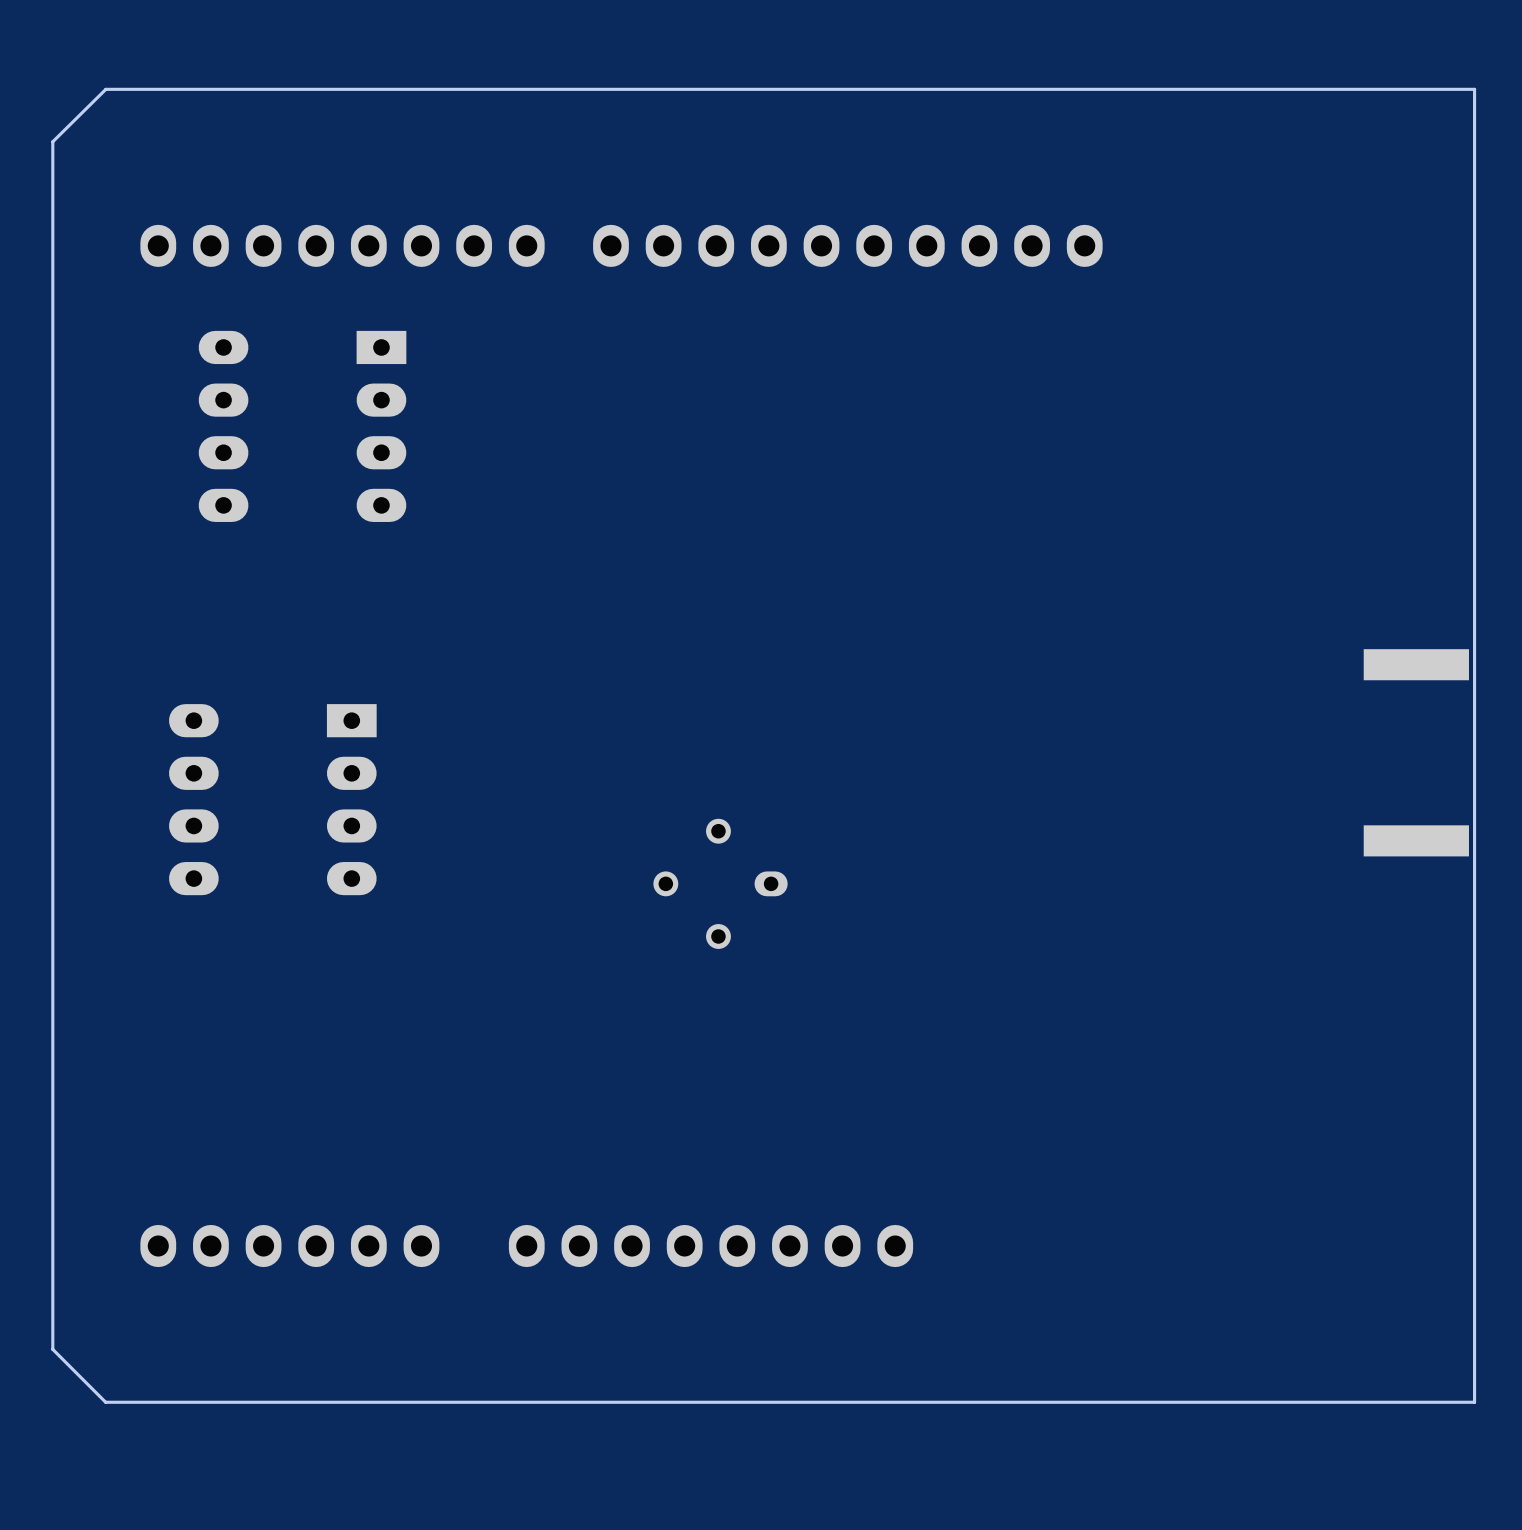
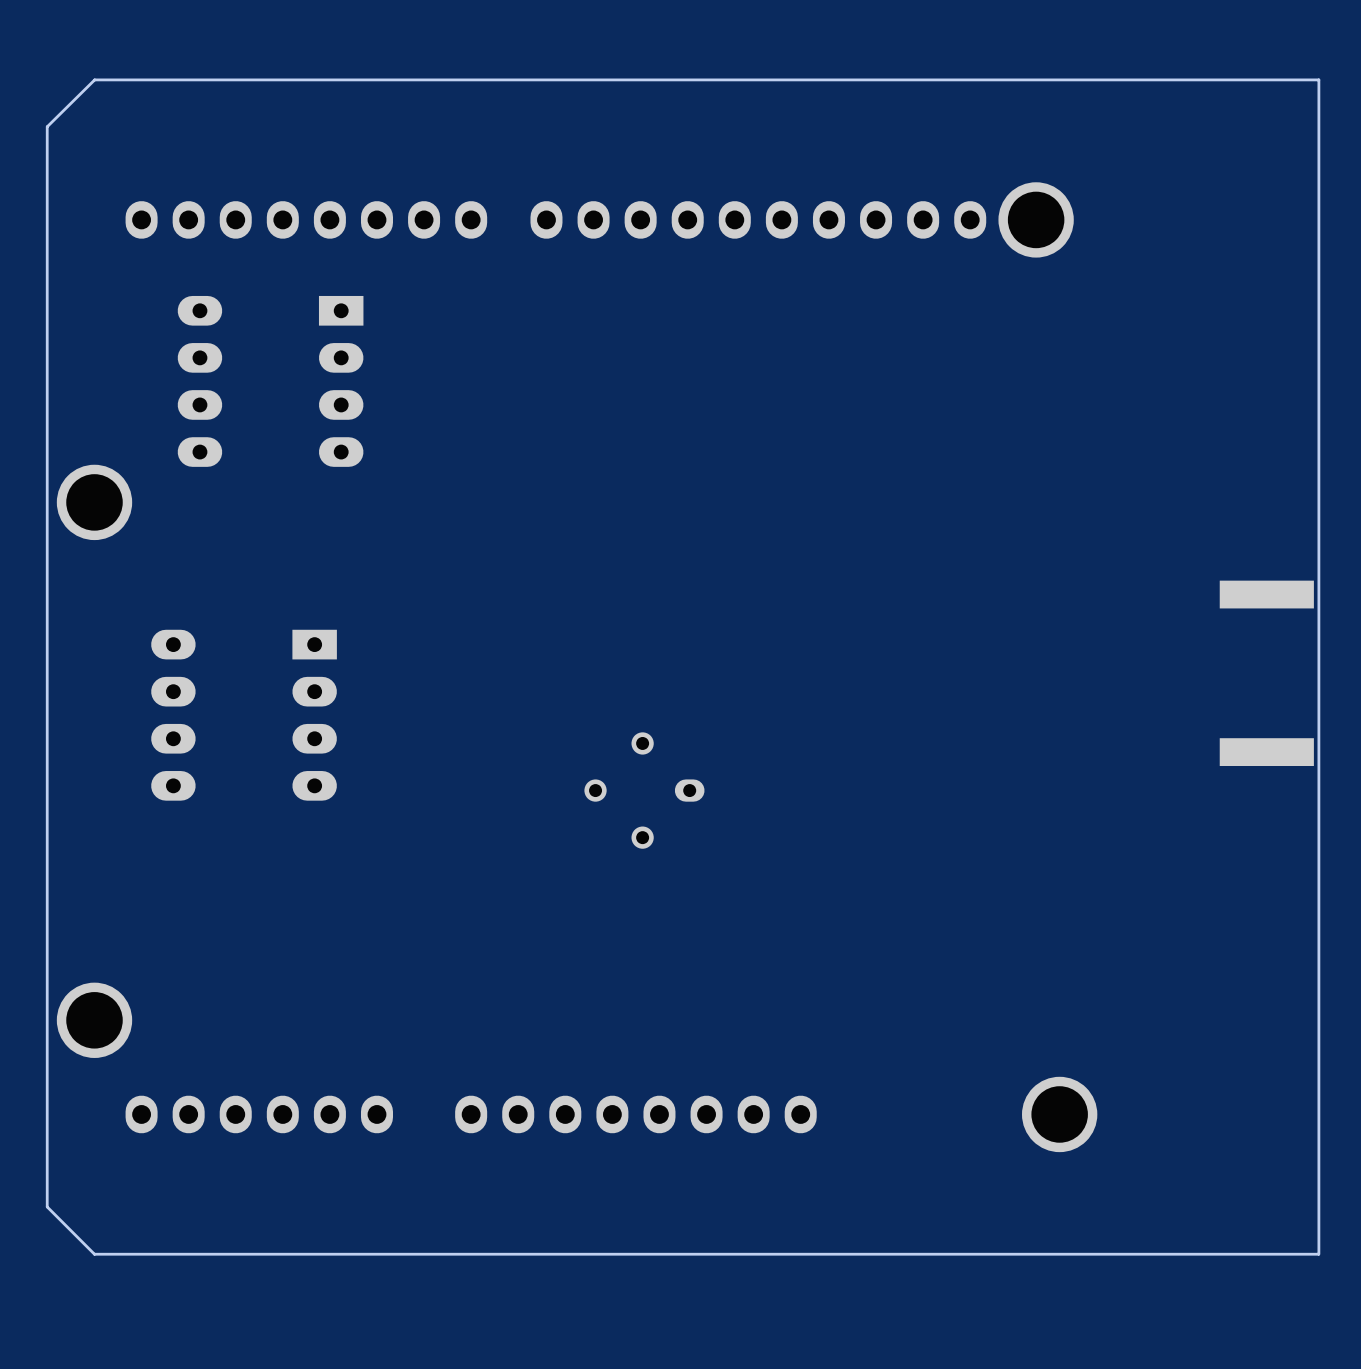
part: none -> (1036, 219)
part: none -> (94, 502)
part: none -> (94, 1020)
part: none -> (1059, 1114)

